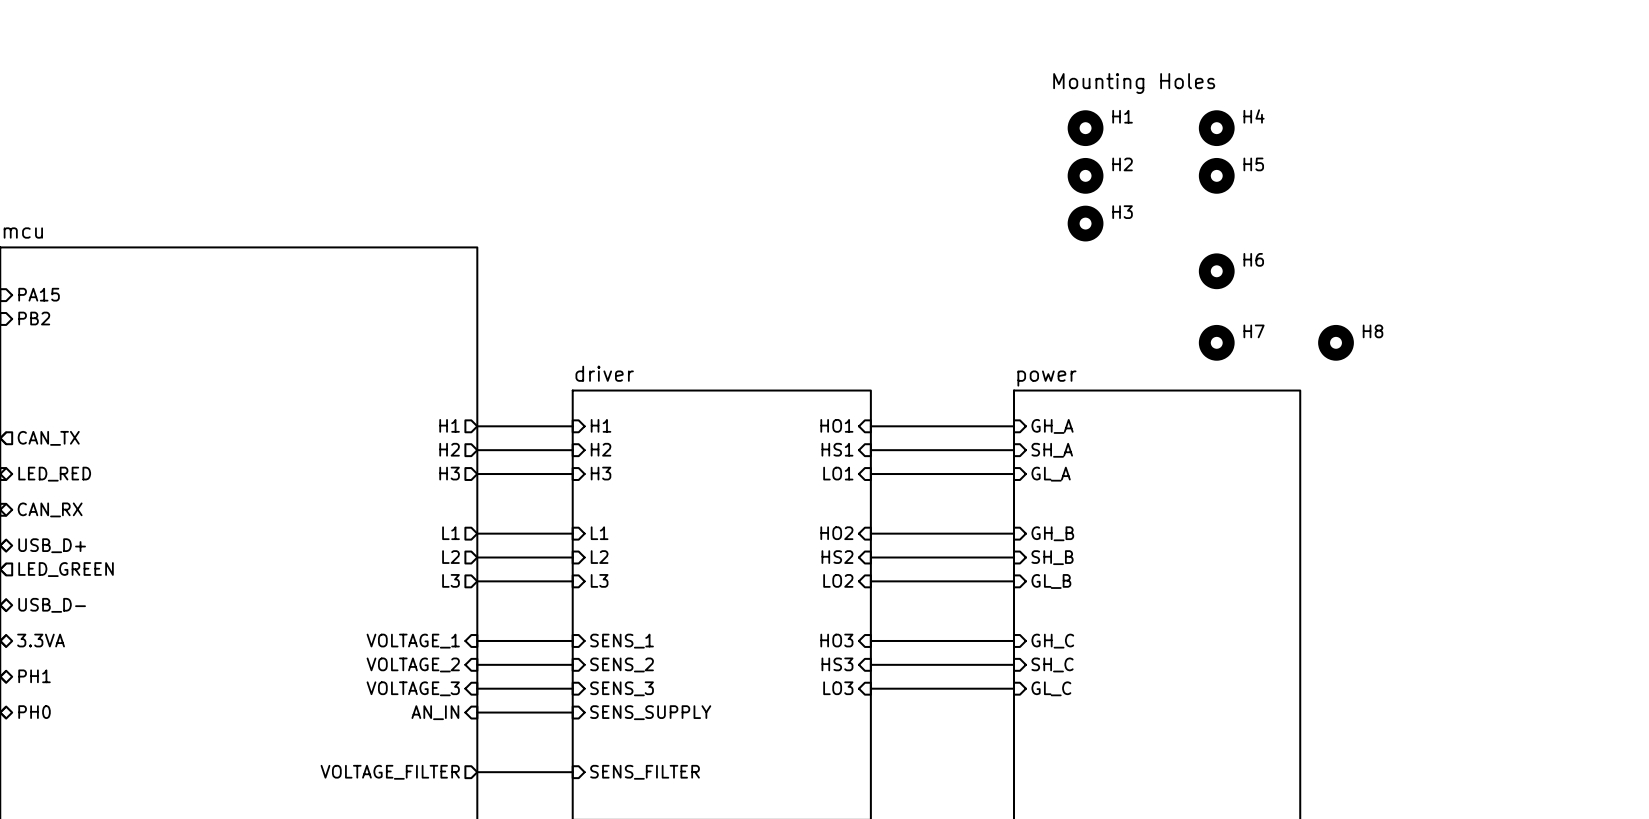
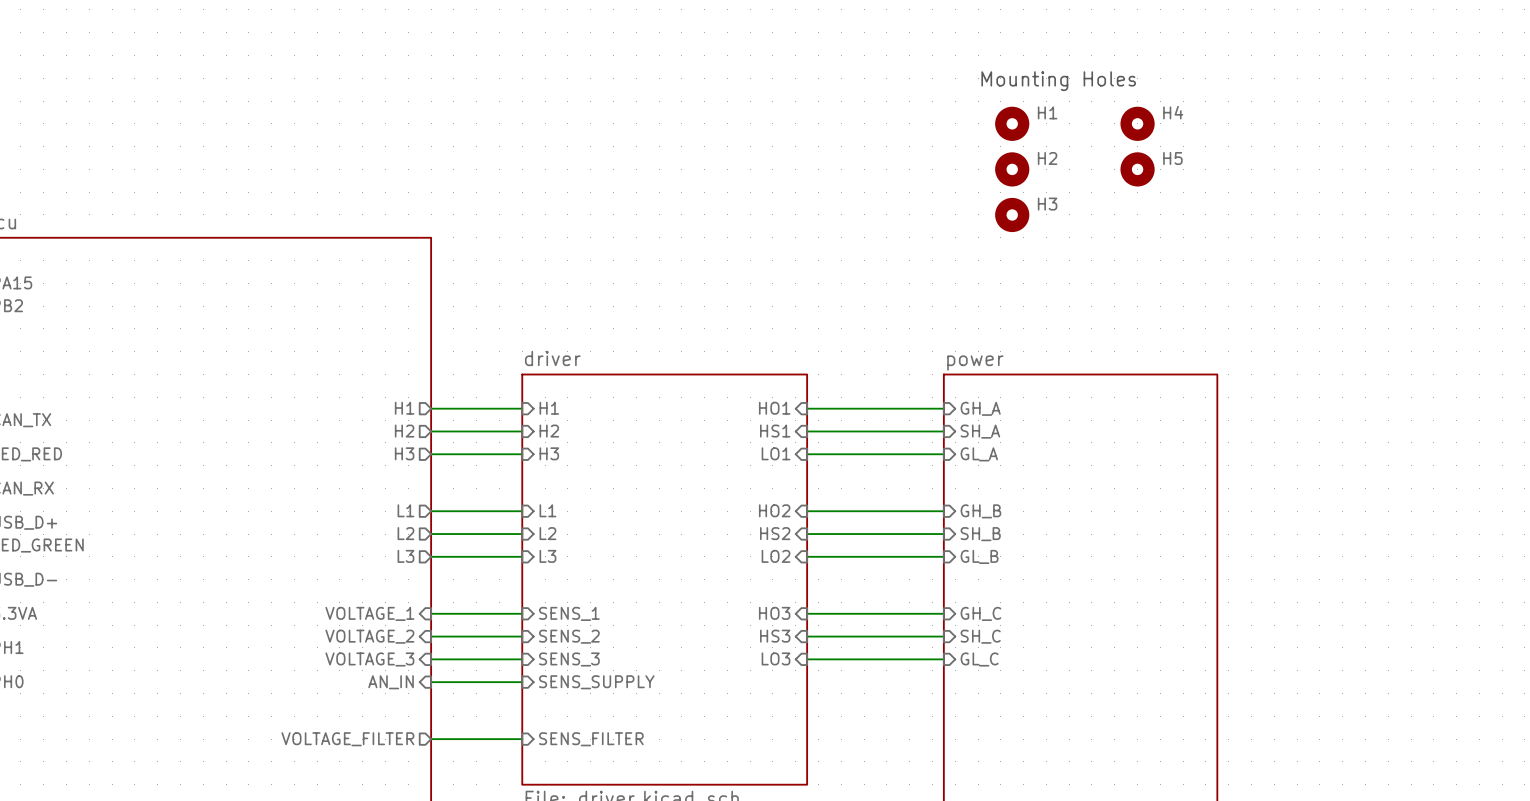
H6: (1216, 271) -> none
H7: (1216, 342) -> none
H8: (1336, 342) -> none

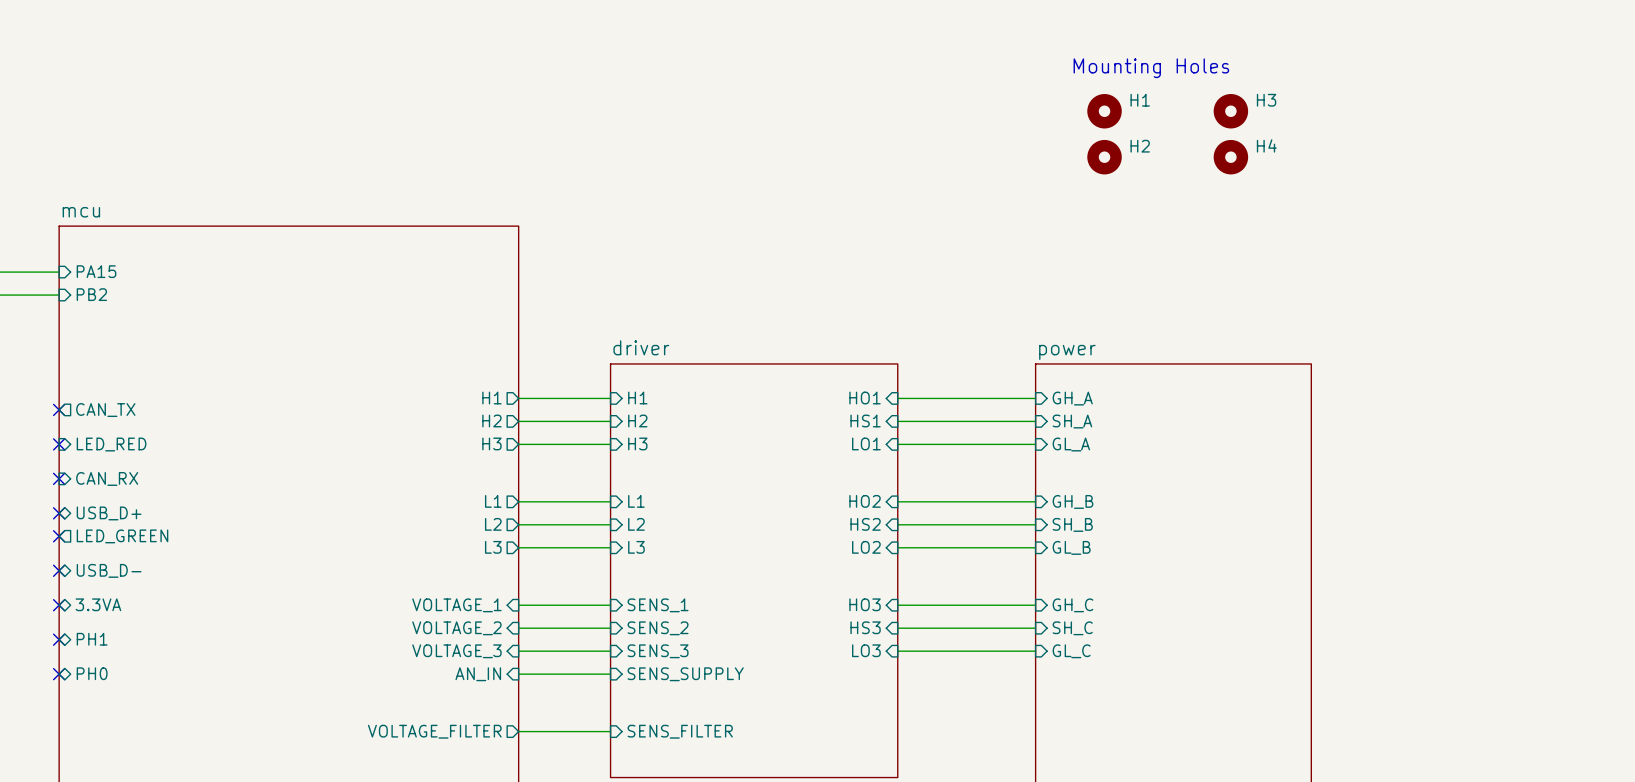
H4 name: H4 (1173, 112) -> H3 (1266, 100)
H5 name: H5 (1172, 158) -> H4 (1266, 145)
H3: (1012, 214) -> none

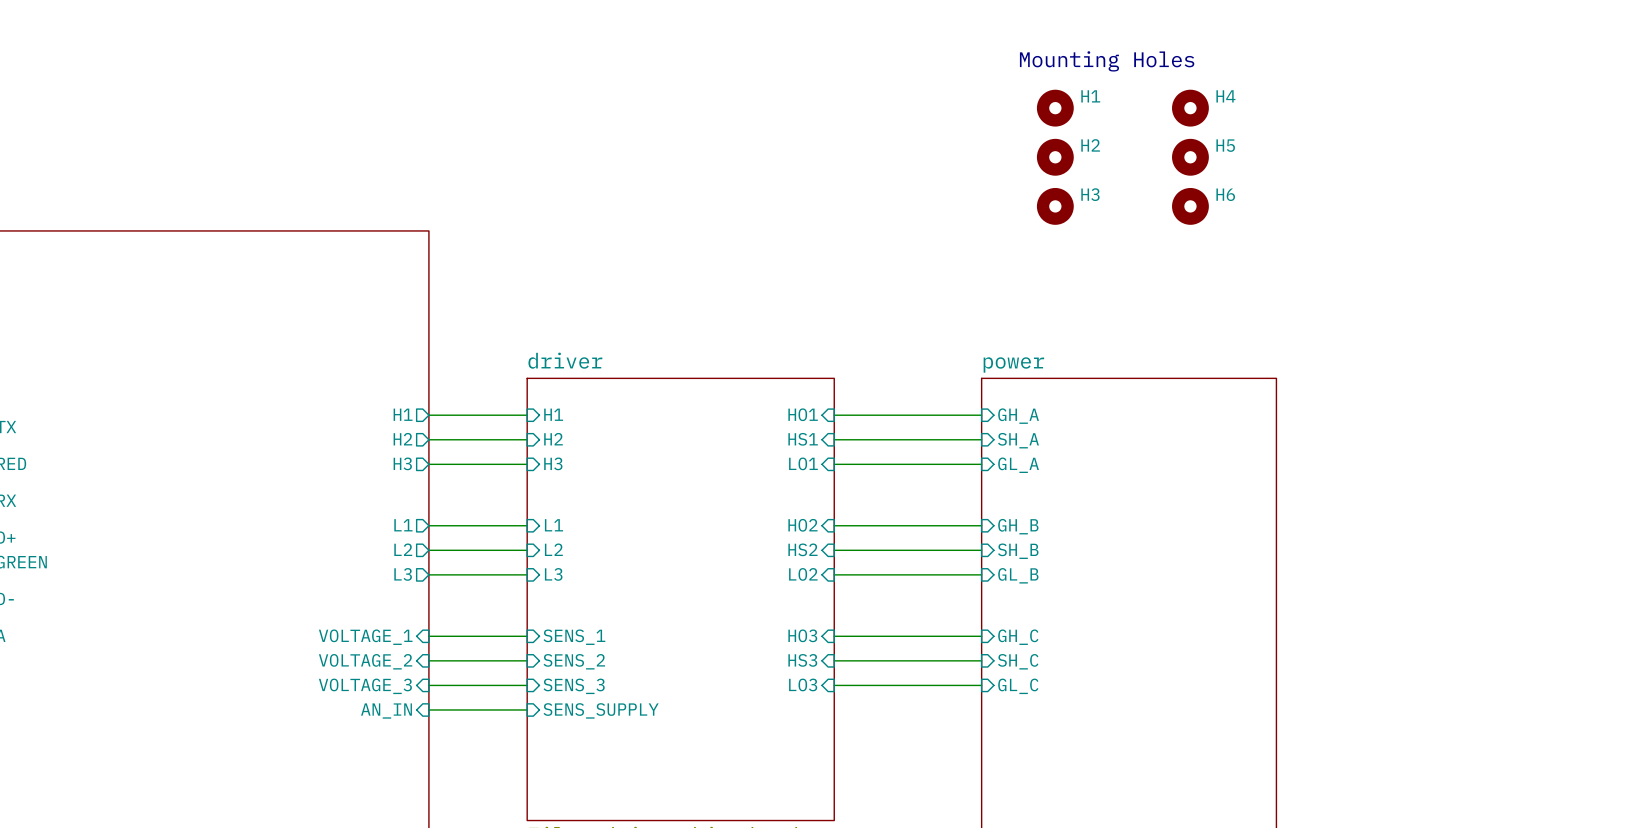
H3 name: H3 (1266, 100) -> H4 (1225, 96)
H4 name: H4 (1266, 145) -> H5 (1225, 145)
H3: none -> (1055, 206)
H6: none -> (1190, 206)
sheet pin: VOLTAGE_FILTER (434, 731) -> none
wire: (518, 731) (610, 731) -> none
sheet pin: SENS_FILTER (680, 731) -> none

